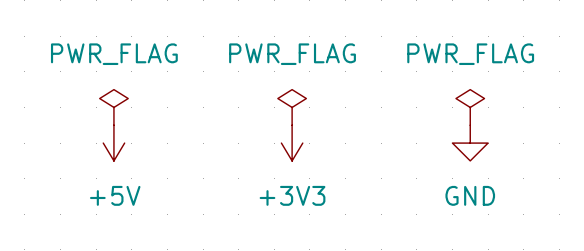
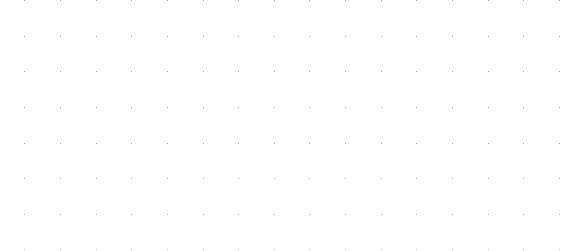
power symbol: PWR_FLAG (113, 107) -> none
power symbol: PWR_FLAG (292, 107) -> none
power symbol: PWR_FLAG (470, 107) -> none
power symbol: +5V (113, 143) -> none
power symbol: +3V3 (292, 143) -> none
power symbol: GND (470, 143) -> none

